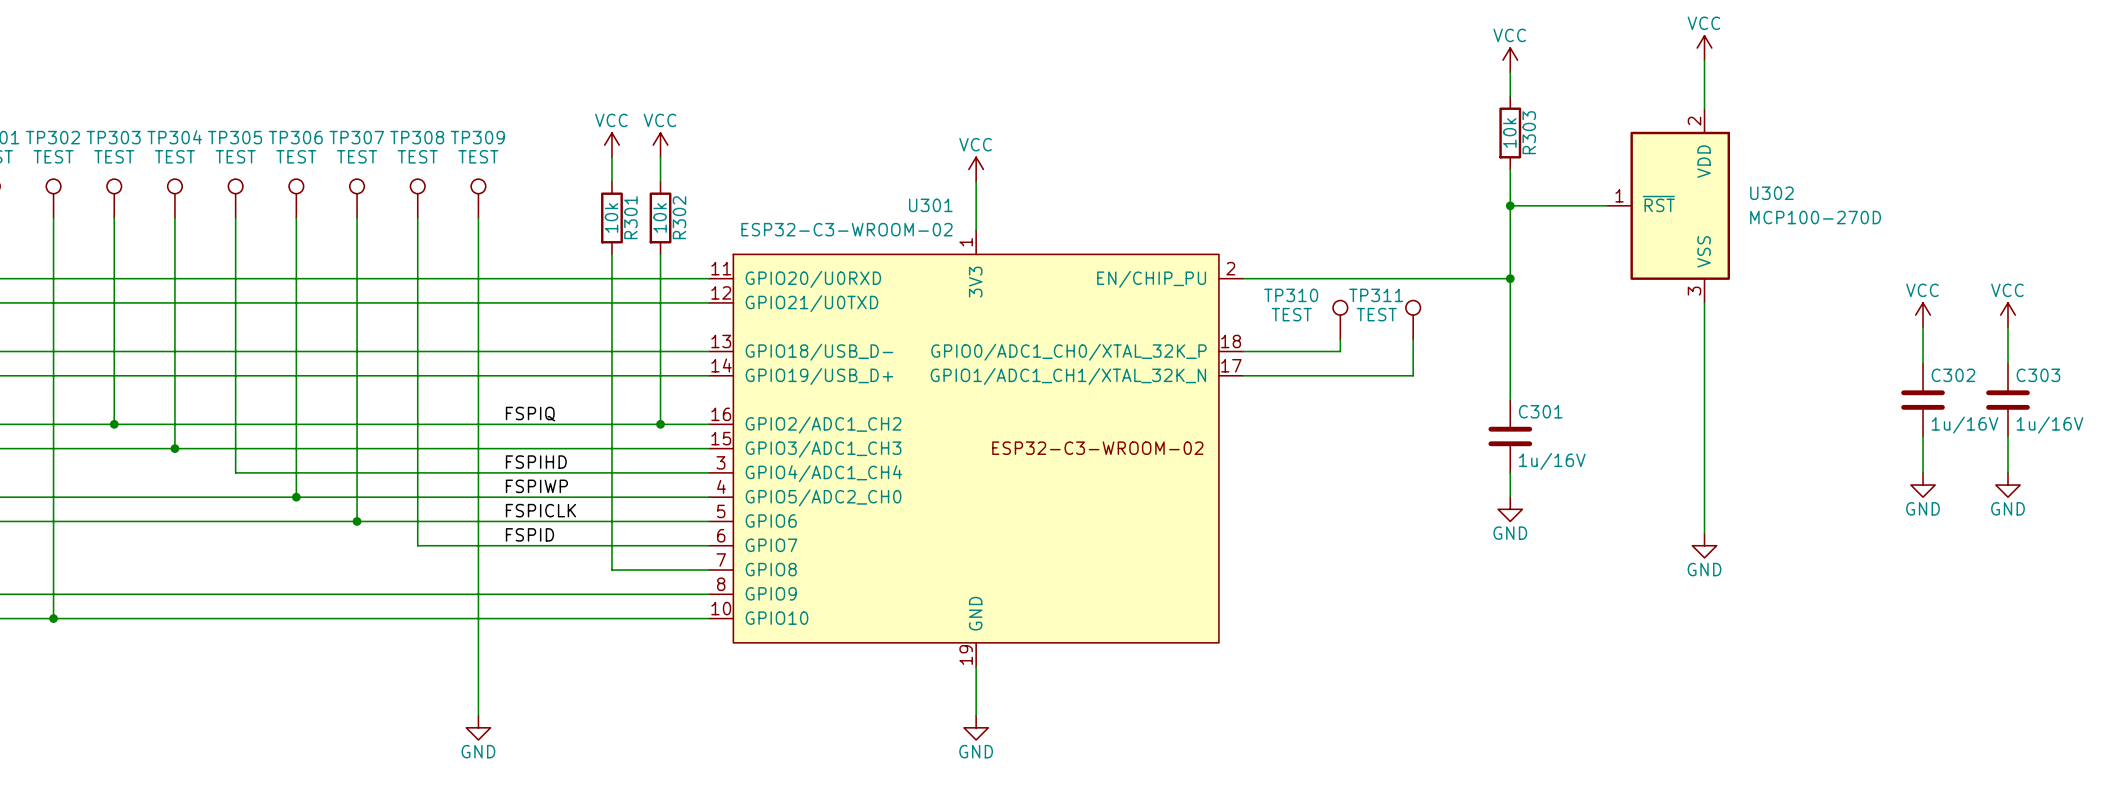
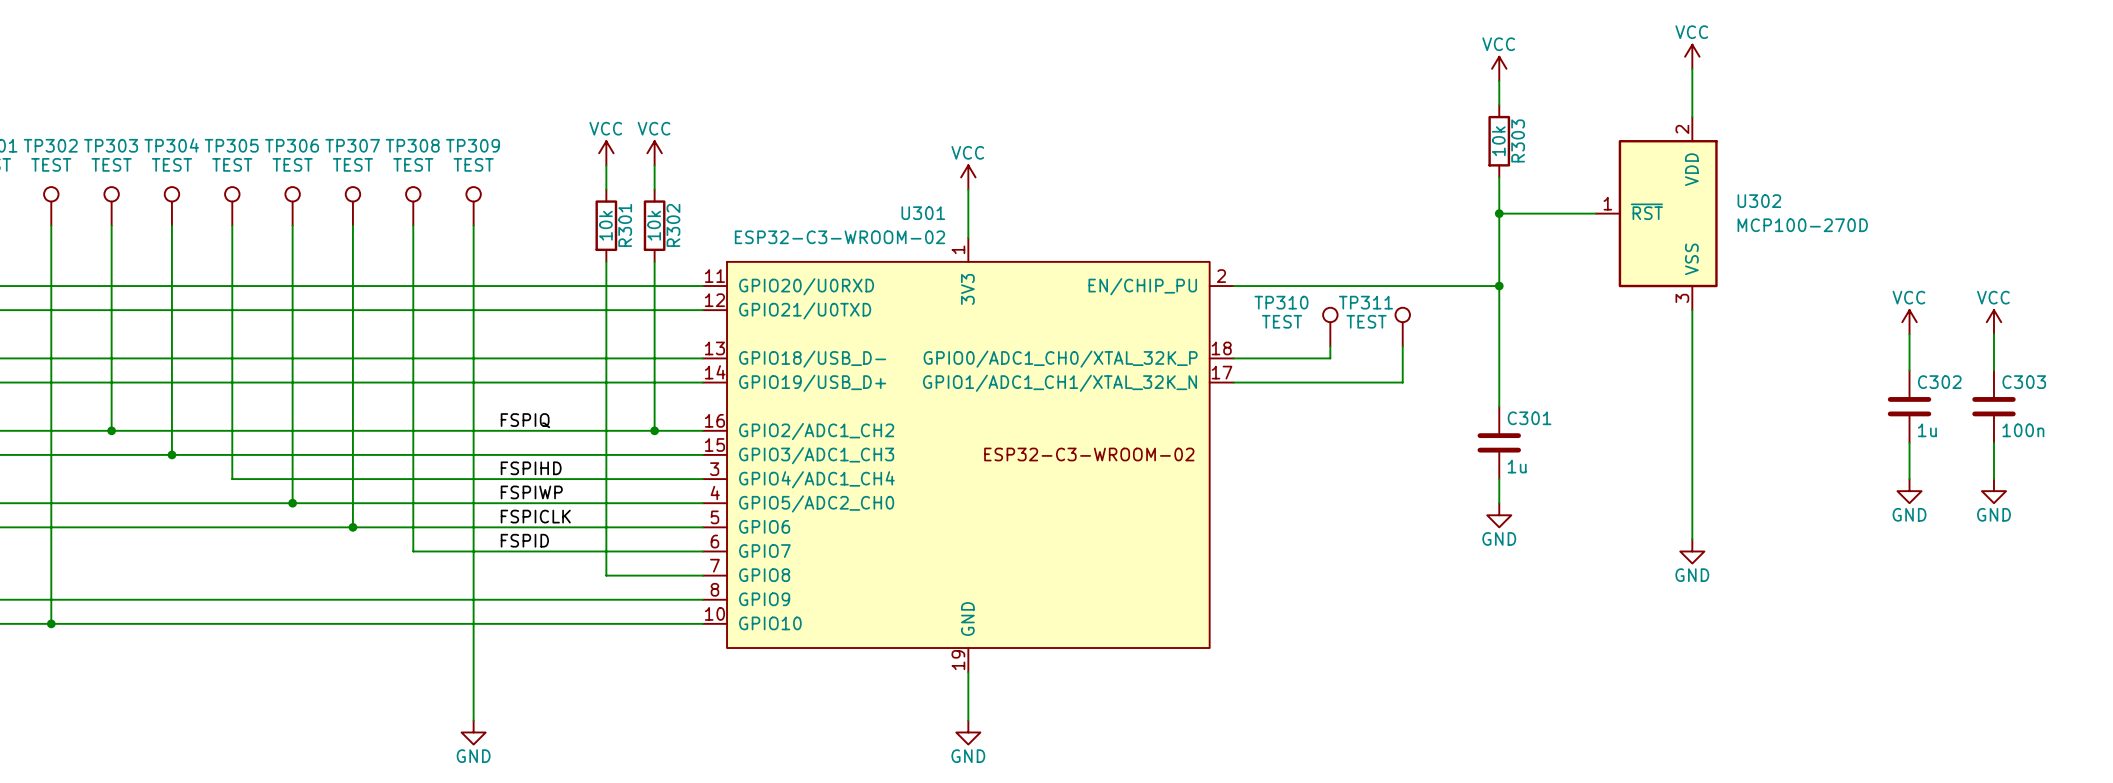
C302 value: 1u/16V (1965, 425) -> 1u (1927, 430)
C303 value: 1u/16V (2050, 425) -> 100n (2023, 430)
C301 value: 1u/16V (1552, 461) -> 1u (1517, 466)

